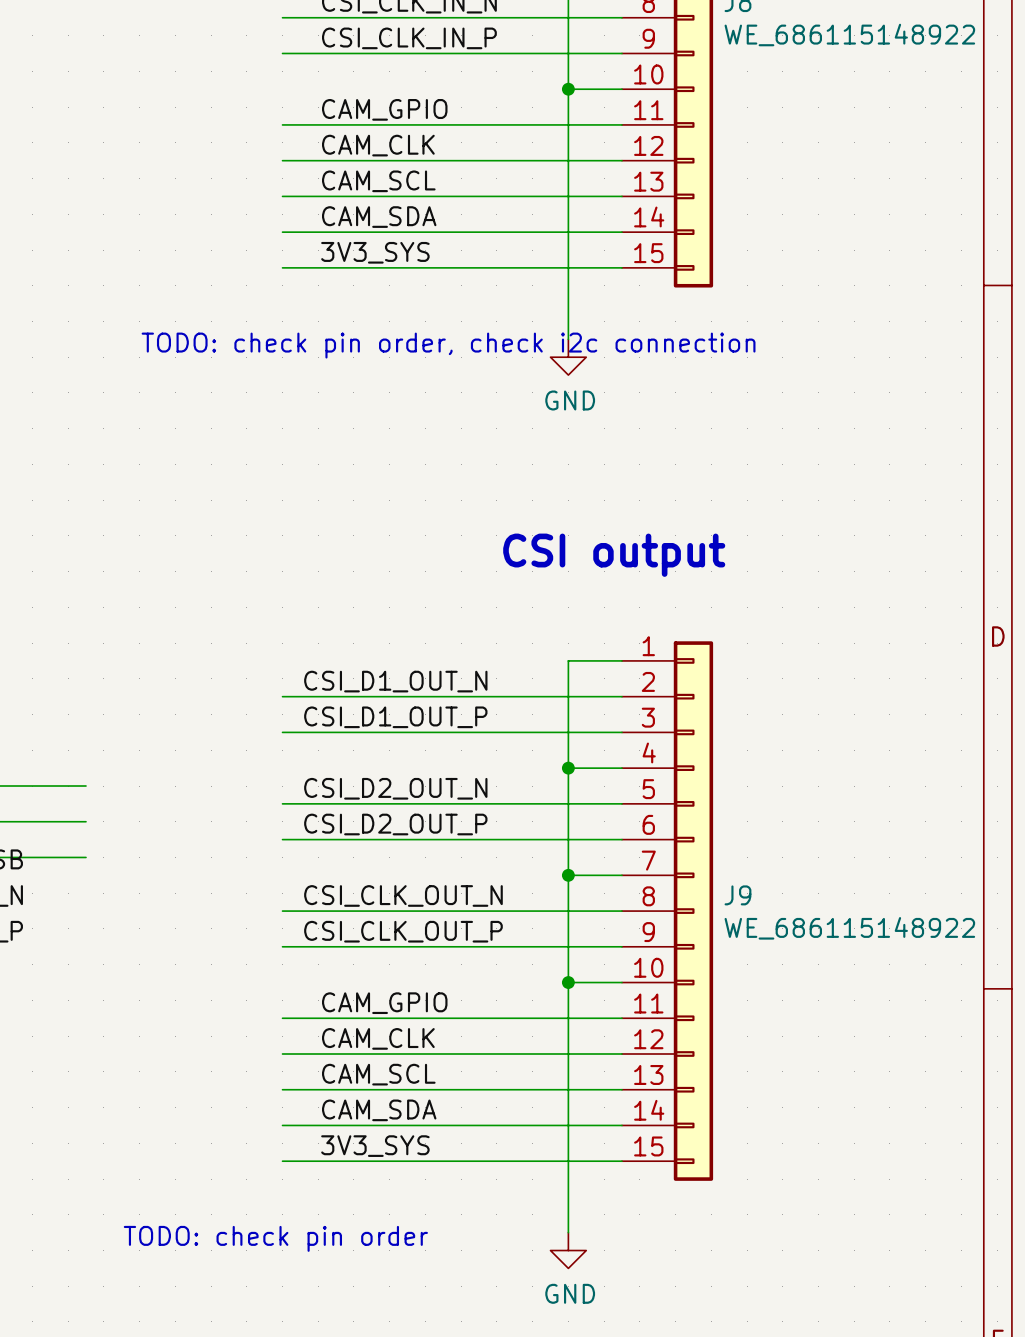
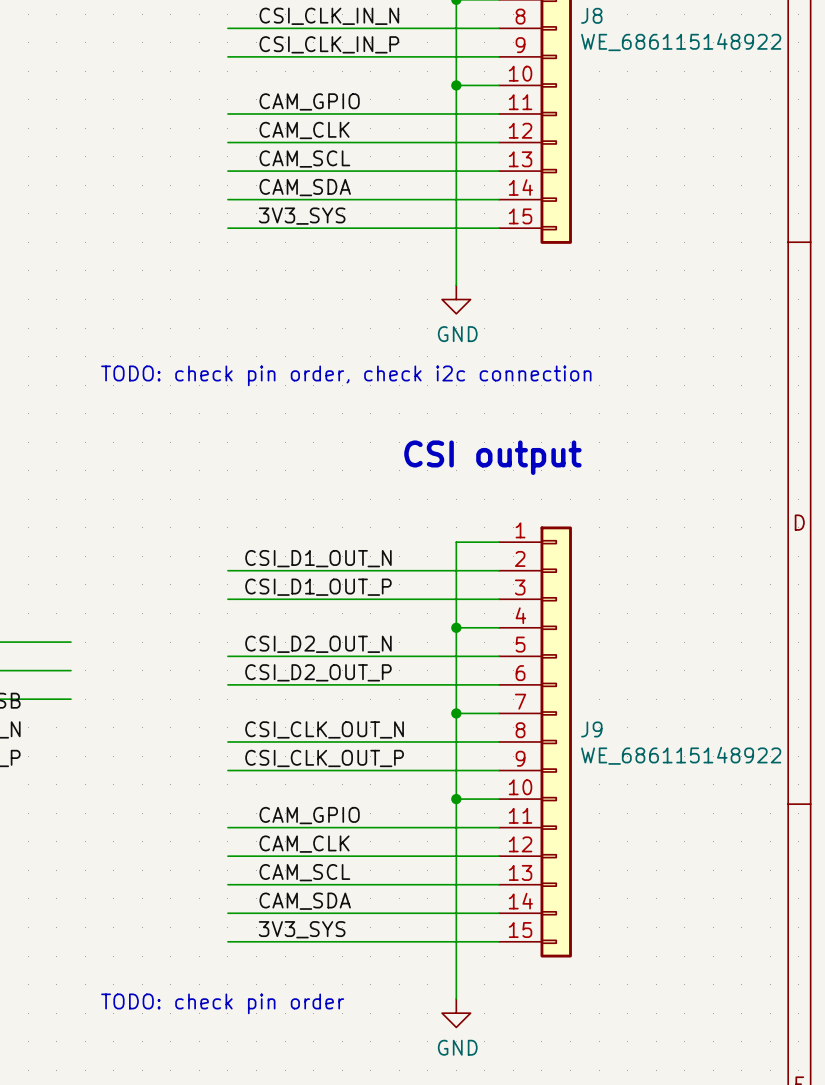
text position: TODO: check pin order, check i2c connection (448, 345) -> TODO: check pin order, check i2c connection (346, 375)

